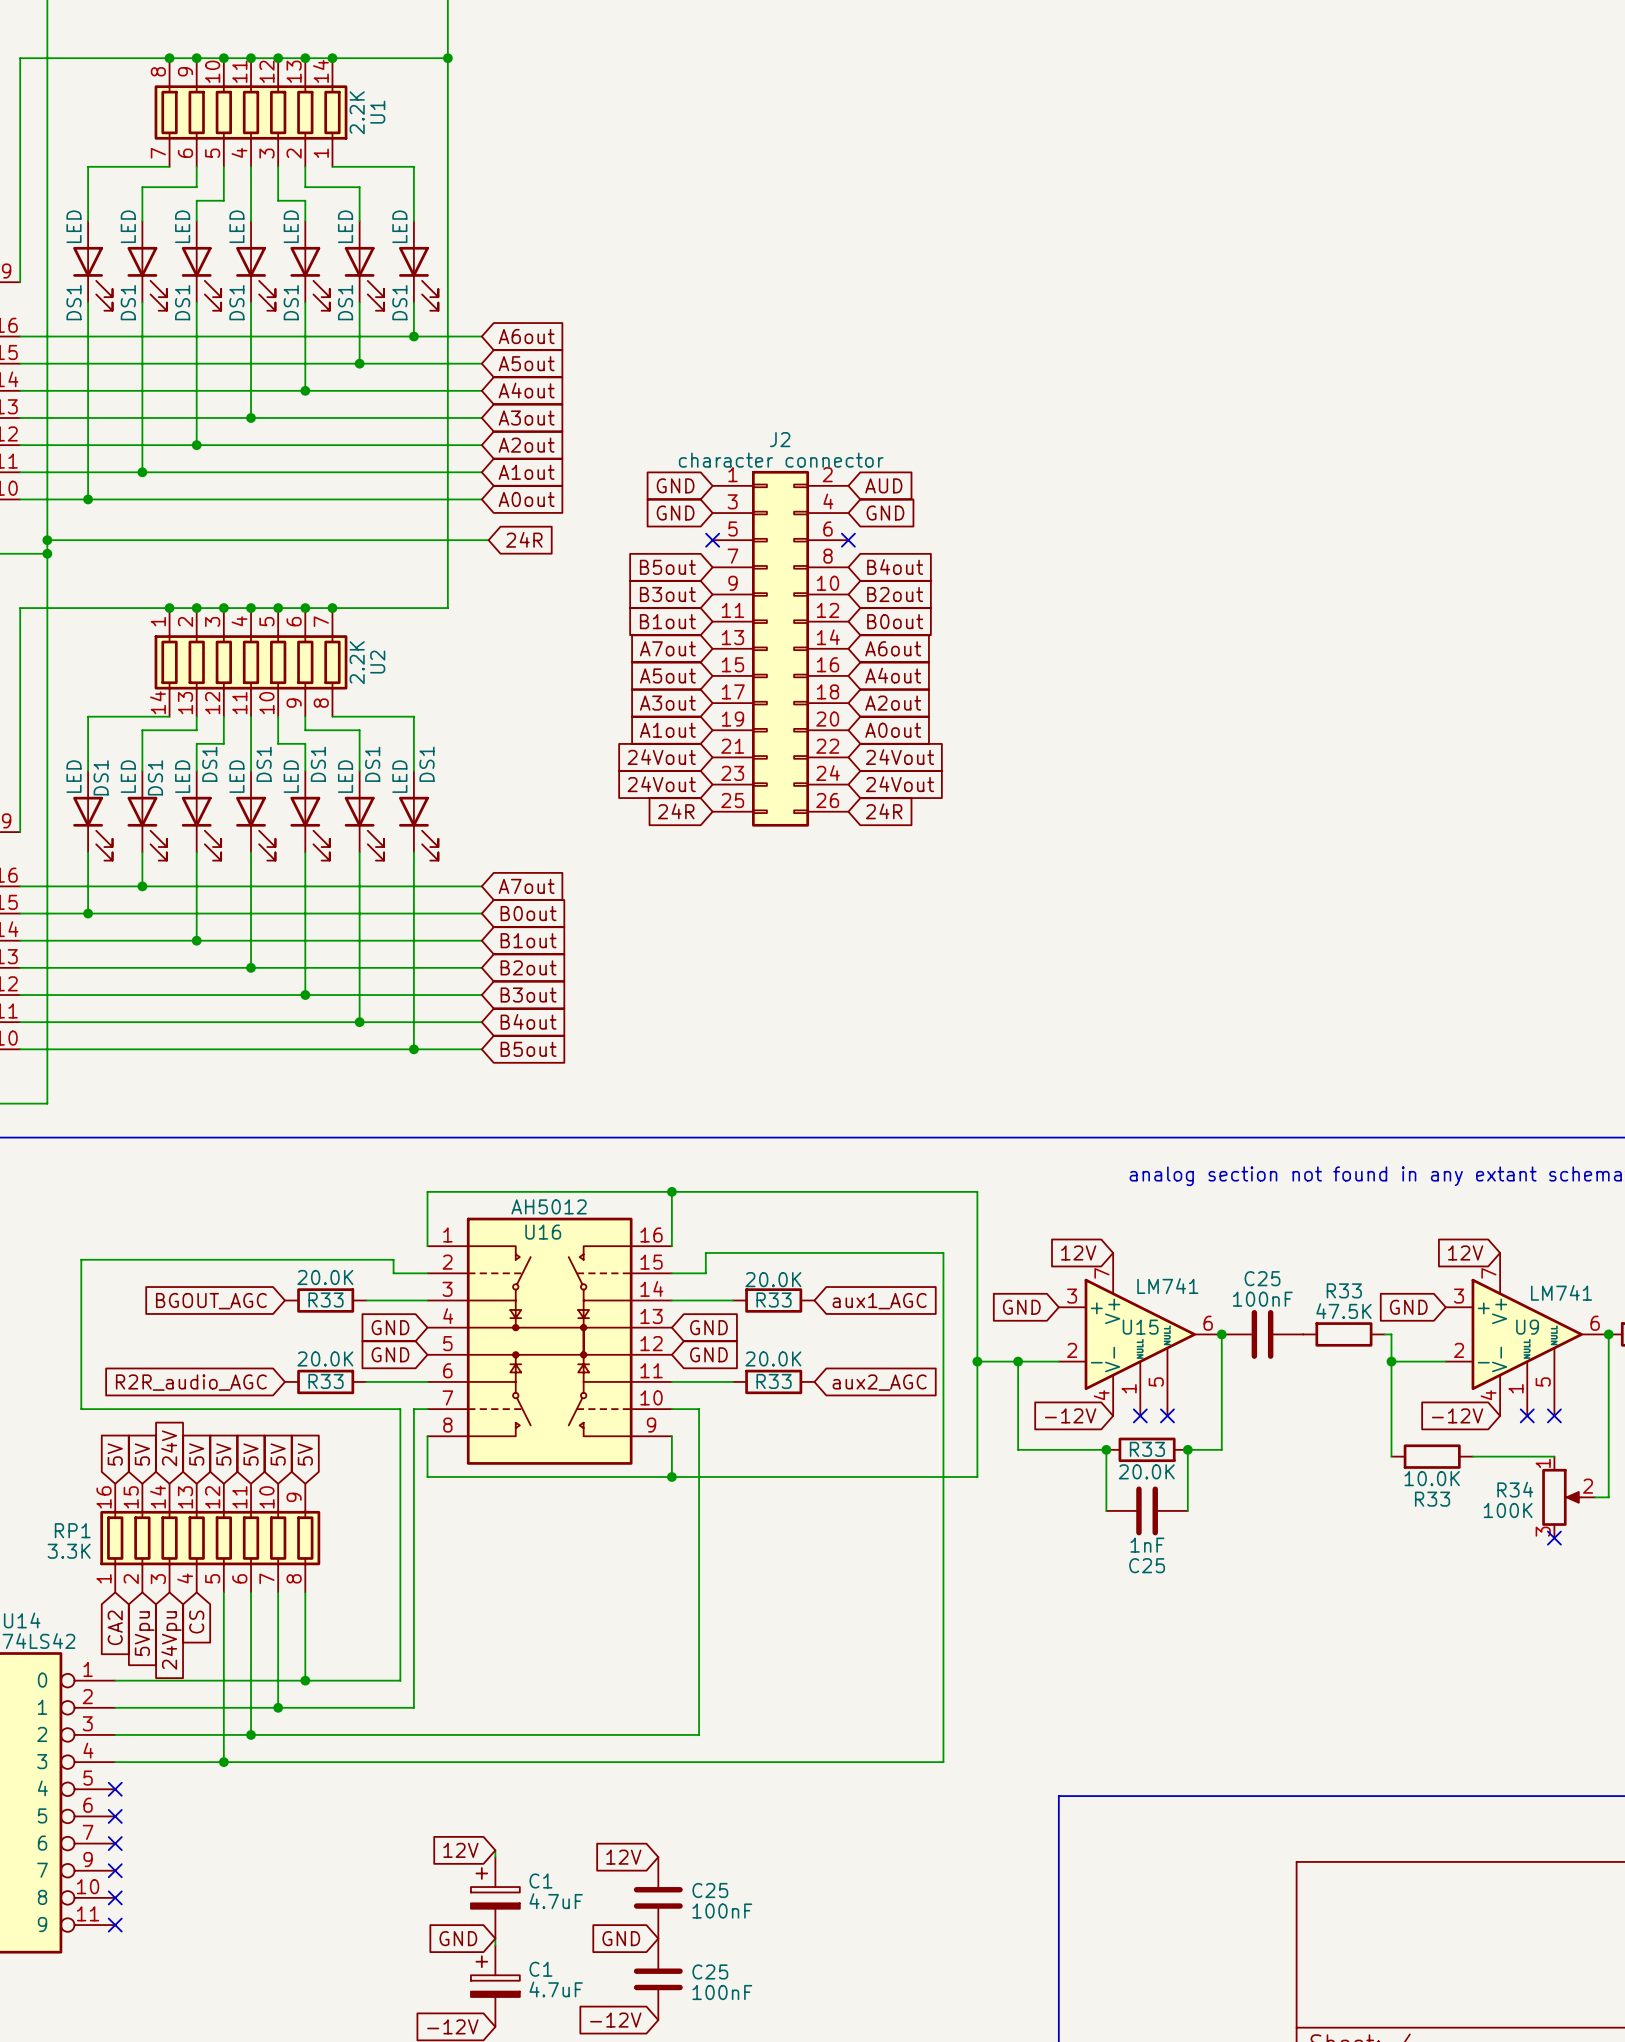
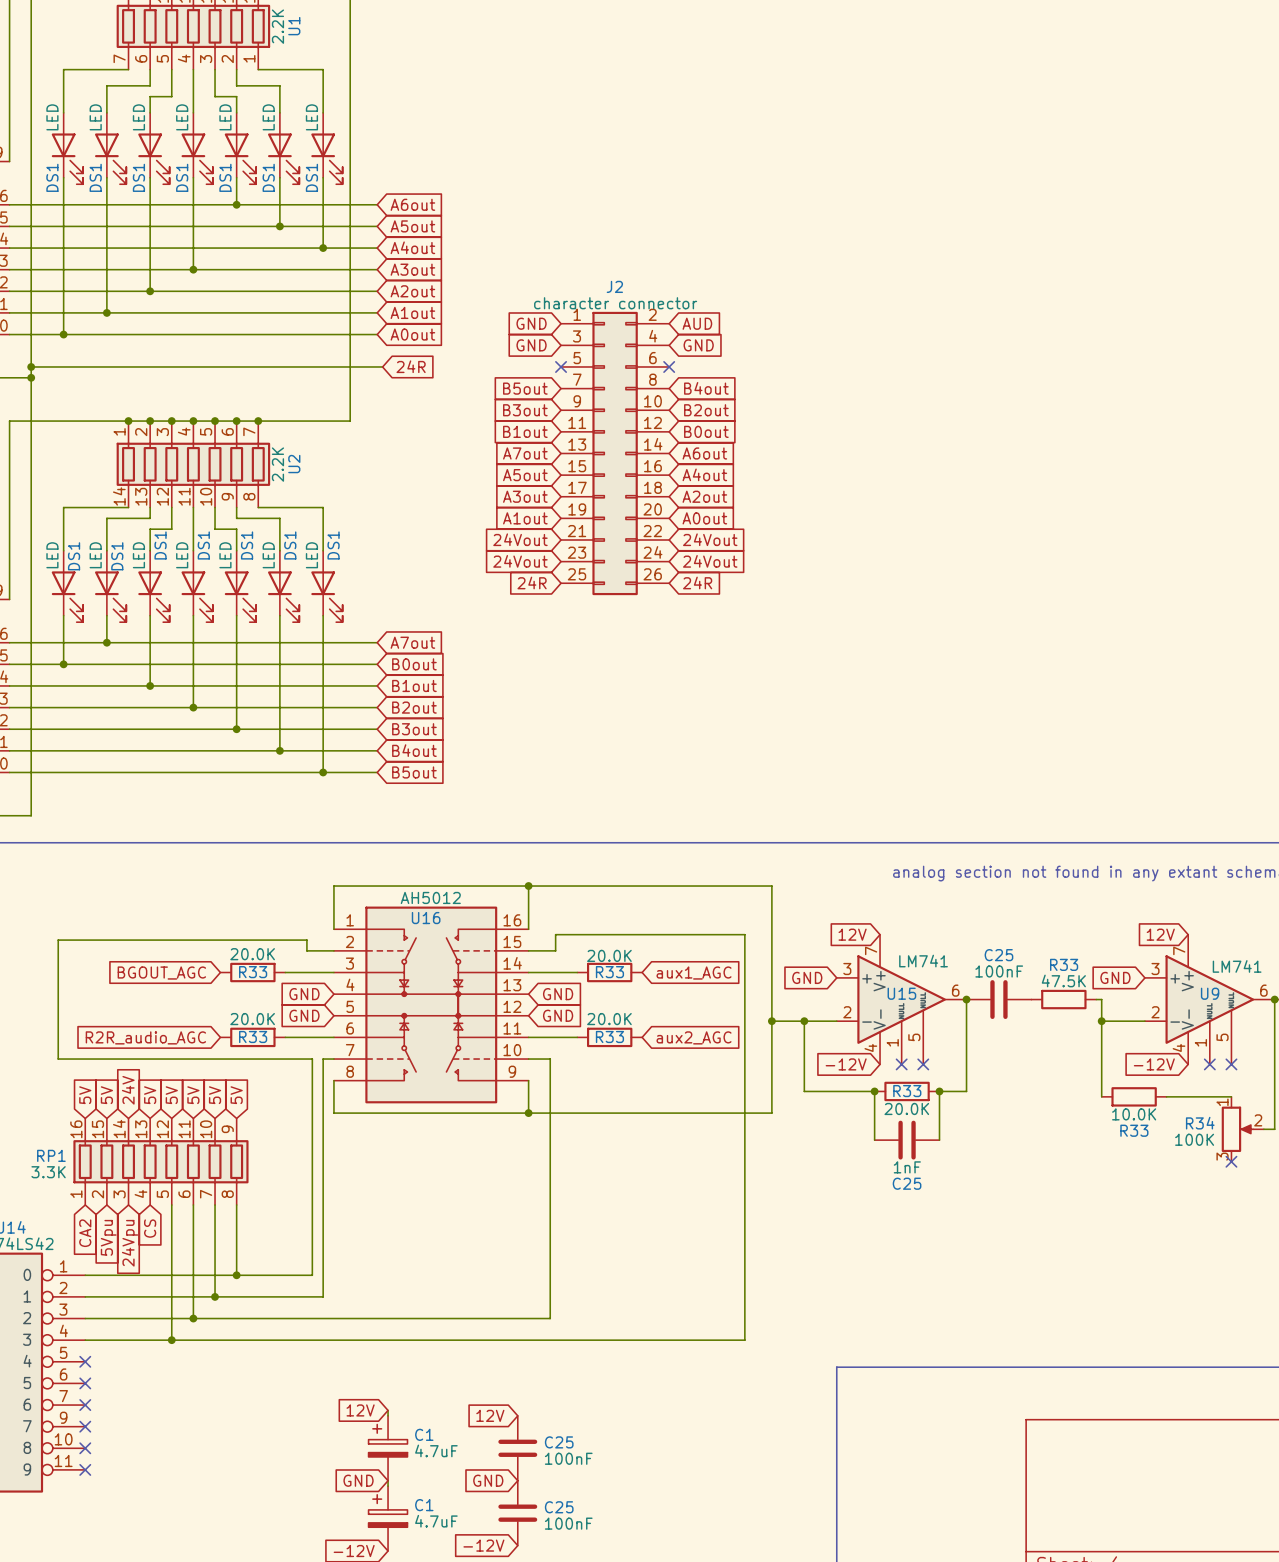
wire: (305, 336) (305, 390) -> (323, 204) (323, 248)
junction: none -> (236, 204)
junction: (413, 336) -> none
junction: (305, 390) -> none
junction: none -> (323, 248)

